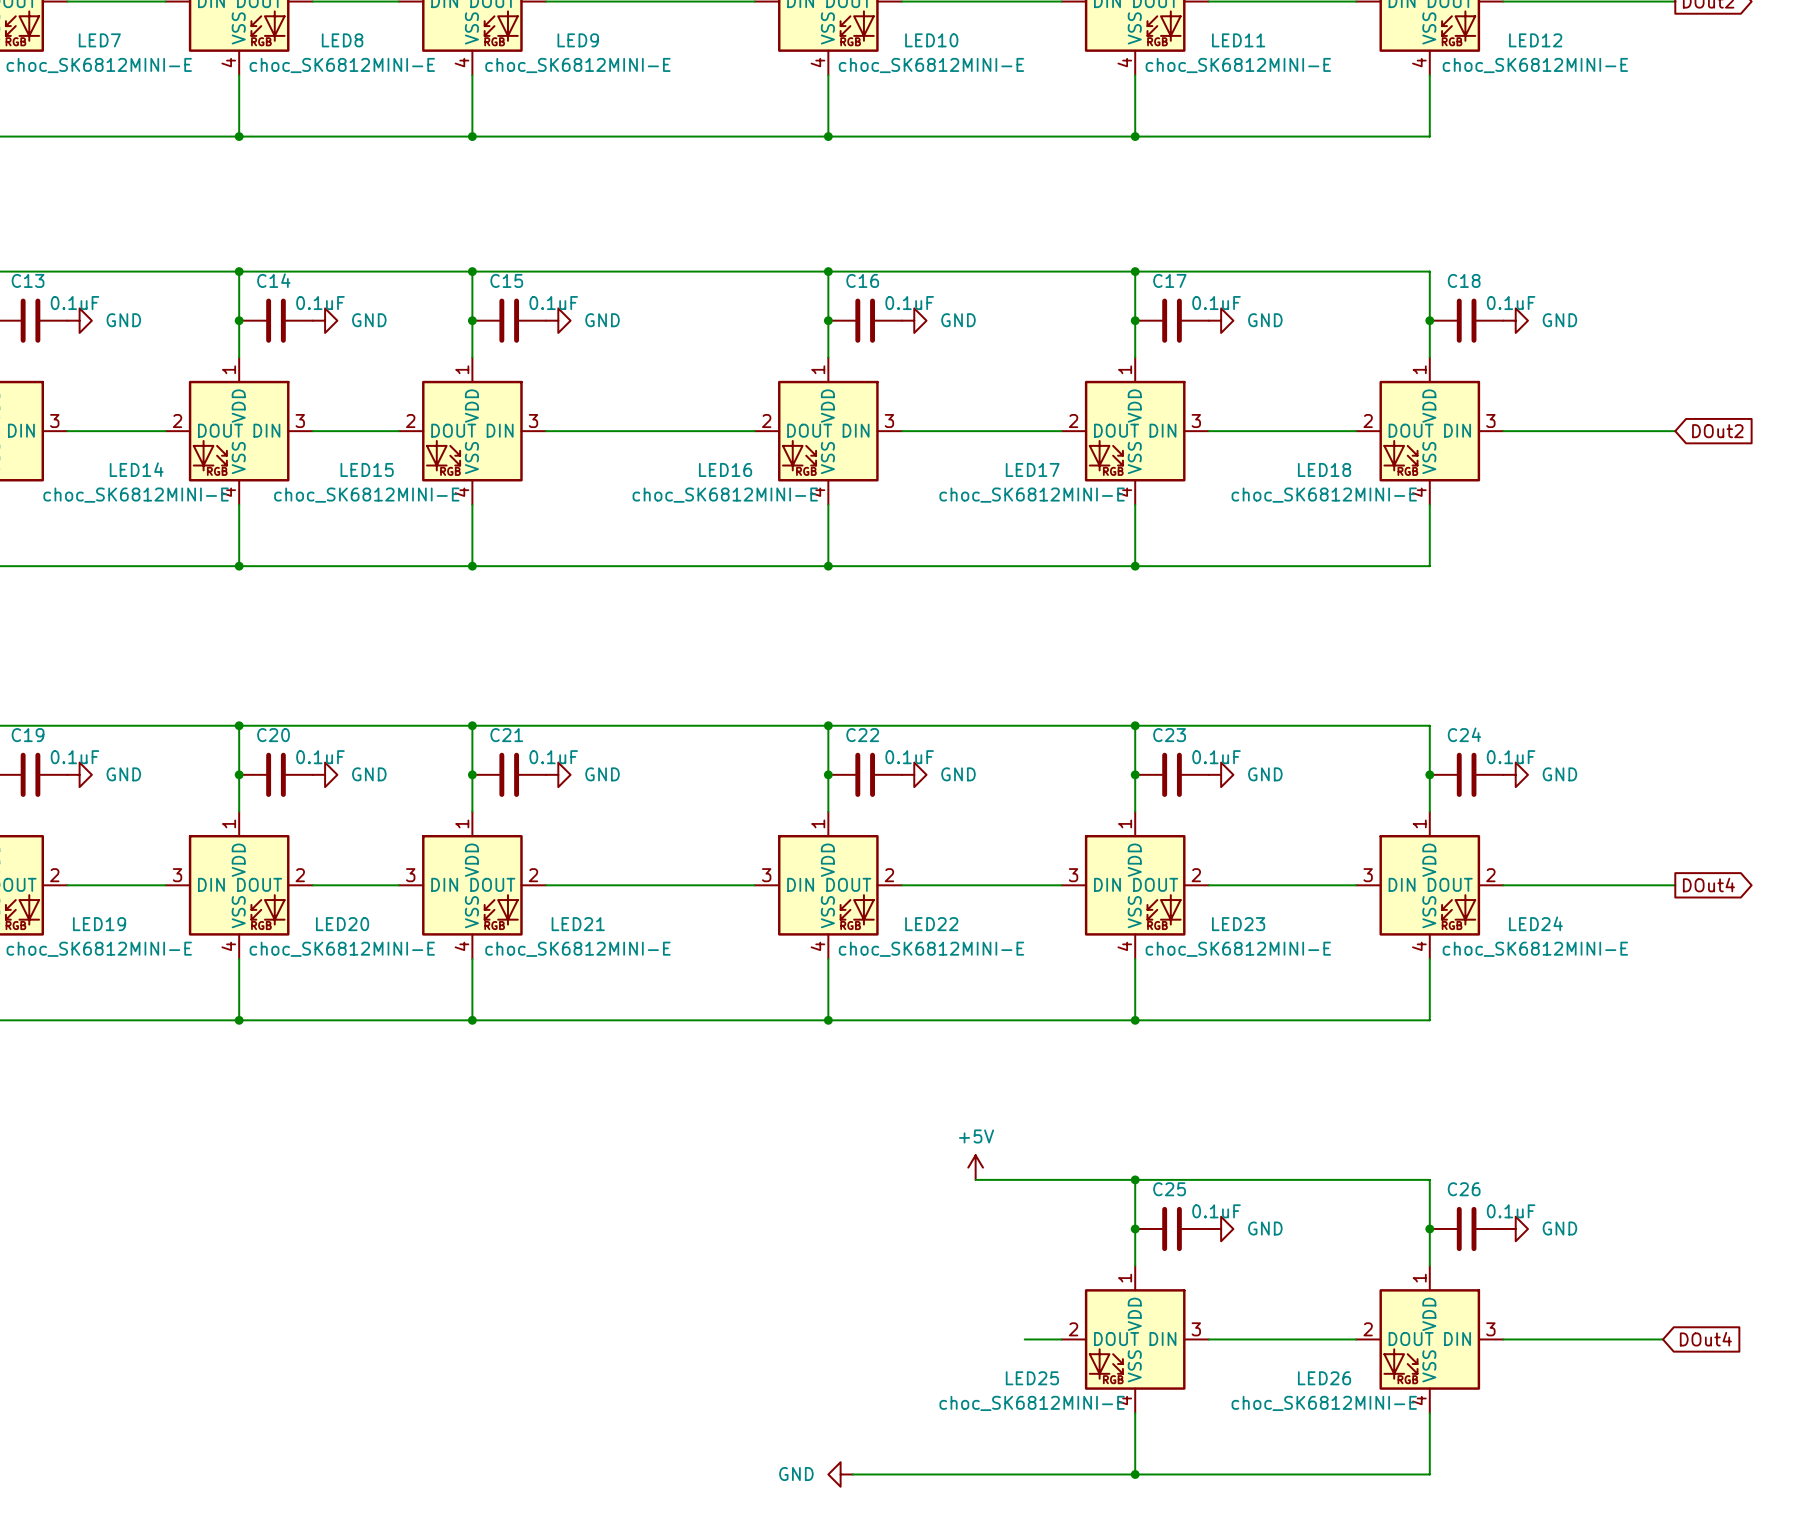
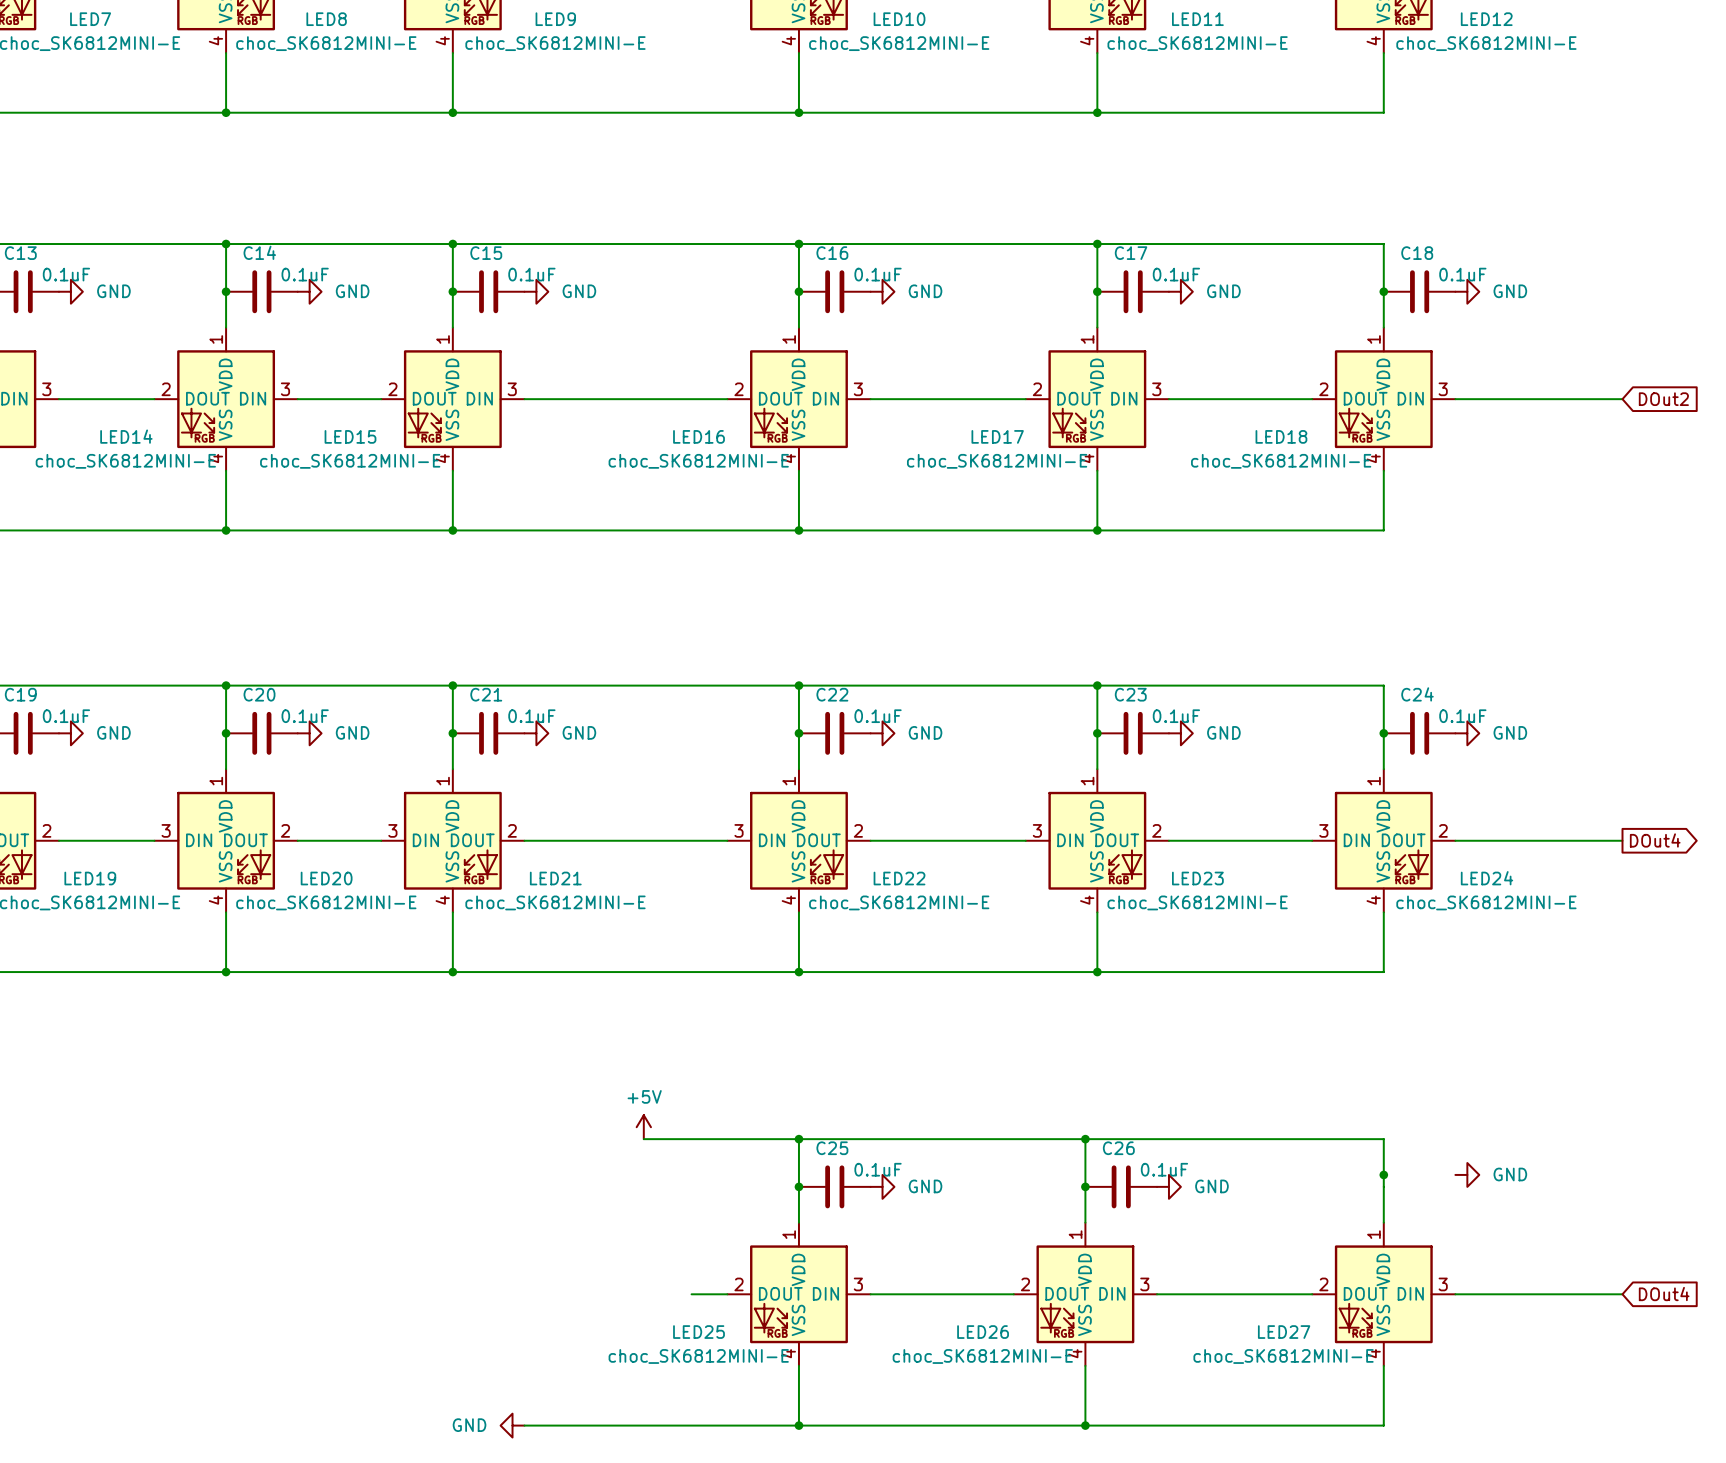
power symbol: +5V (975, 1167) -> none
power symbol: none -> +5V (643, 1127)
wire: (975, 1179) (1429, 1179) (1429, 1192) -> (643, 1139) (1383, 1139)
wire: (1135, 1179) (1135, 1265) -> (1085, 1139) (1085, 1222)
junction position: (1135, 1179) -> (1085, 1139)
wire: none -> (798, 1139) (798, 1222)
junction: none -> (798, 1139)
junction position: (1135, 1228) -> (1085, 1186)
C25 position: (1172, 1228) -> (834, 1186)
power symbol position: GND (1221, 1228) -> GND (1168, 1186)
C26 position: (1466, 1228) -> (1121, 1186)
junction: none -> (798, 1186)
power symbol: none -> GND (882, 1186)
wire: (1024, 1339) (1061, 1339) -> none
LED25 position: (1135, 1339) -> (798, 1294)
wire: (1208, 1339) (1356, 1339) -> none
LED26 position: (1429, 1339) -> (1085, 1294)
wire: (1503, 1339) (1663, 1339) -> none
global label position: DOut4 (1705, 1339) -> DOut4 (1664, 1294)
wire: none -> (691, 1294) (727, 1294)
wire: none -> (870, 1294) (1013, 1294)
wire: none -> (1157, 1294) (1312, 1294)
LED27: none -> choc_SK6812MINI-E (1383, 1294)
wire: none -> (1455, 1294) (1622, 1294)
wire: (1135, 1413) (1135, 1474) -> (1085, 1365) (1085, 1425)
wire: none -> (798, 1365) (798, 1425)
power symbol: GND (840, 1474) -> none
wire: (852, 1474) (1429, 1474) -> (524, 1425) (1383, 1425) (1383, 1413)
junction position: (1135, 1474) -> (1085, 1425)
power symbol: none -> GND (512, 1425)
junction: none -> (798, 1425)

